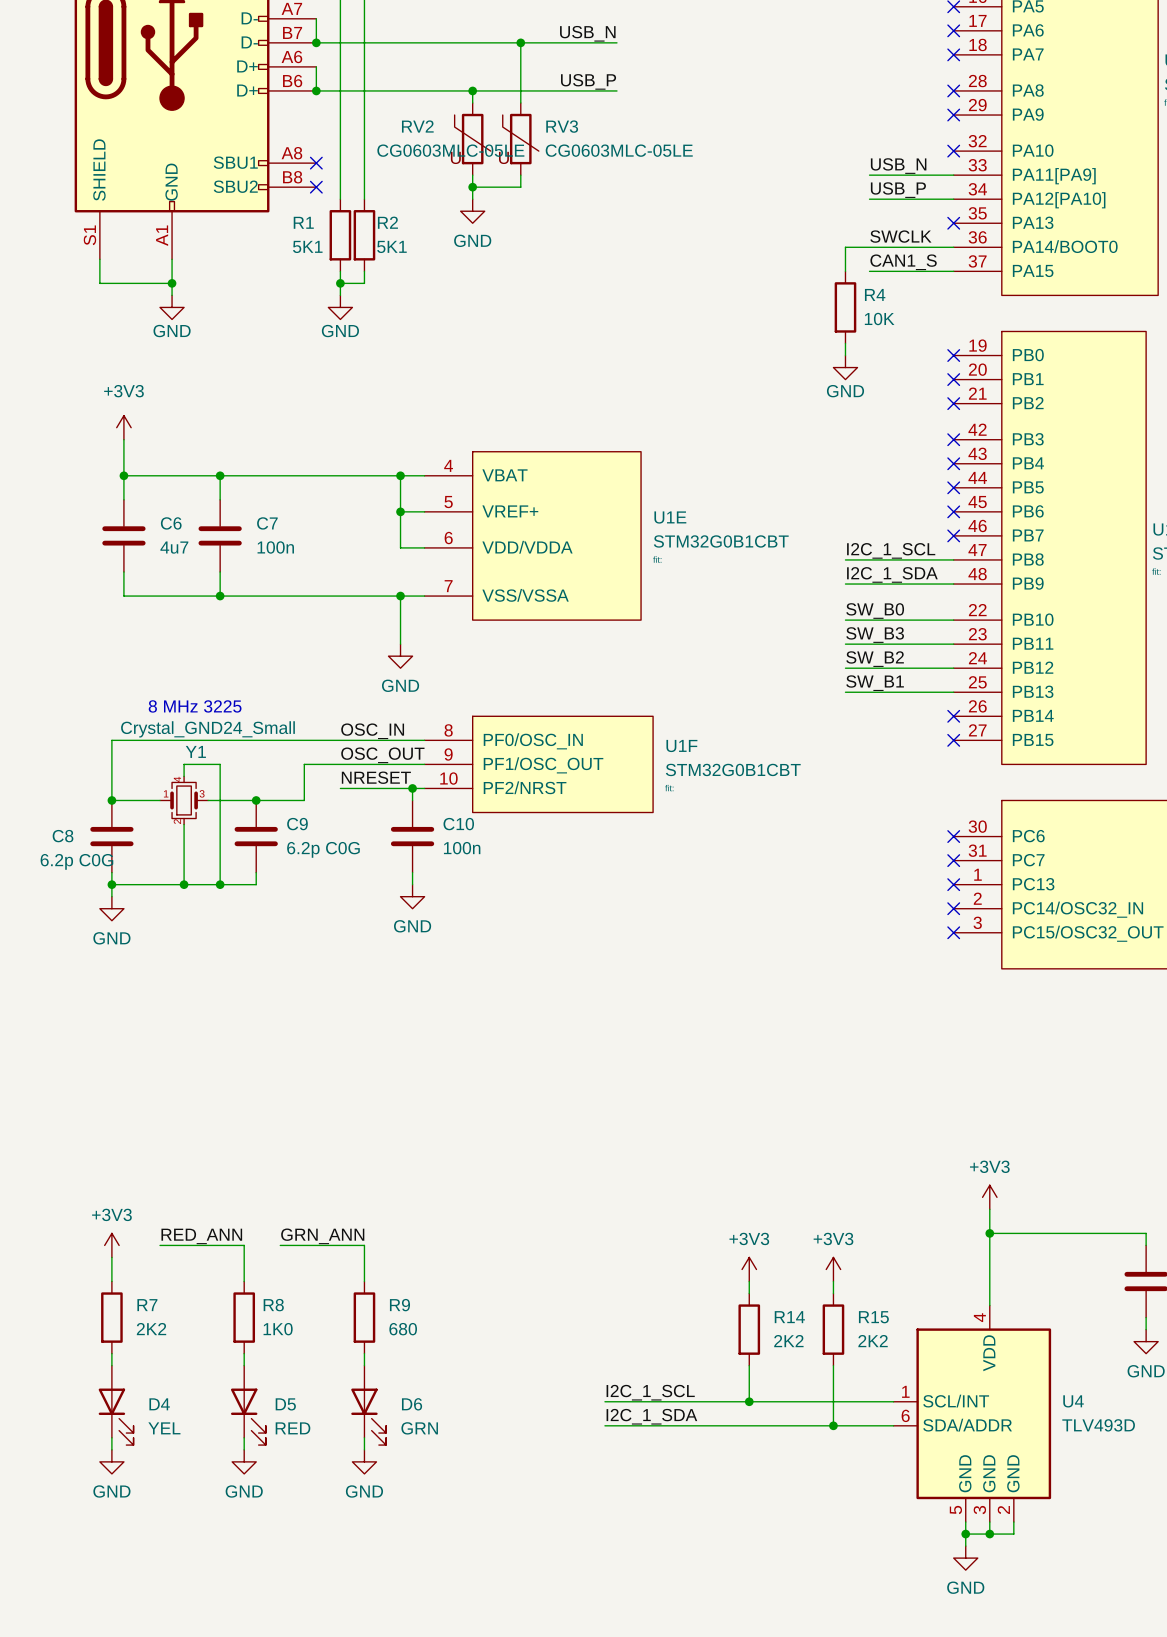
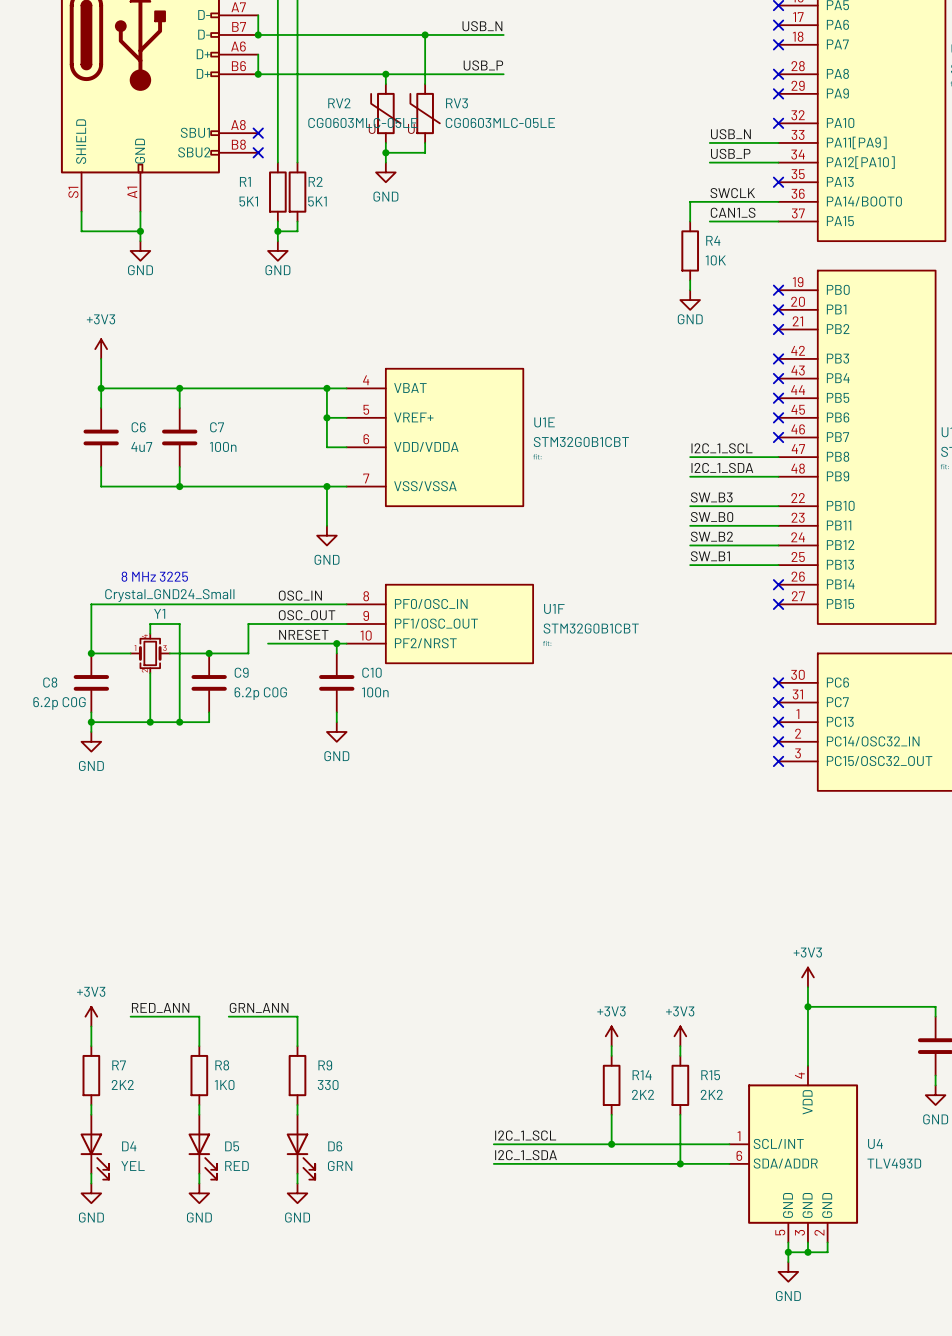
label: SW_B0 (875, 611) -> SW_B3 (711, 497)
label: SW_B3 (875, 635) -> SW_B0 (712, 517)
wire: none -> (268, 643) (277, 643)
R9 value: 680 (403, 1329) -> 330 (328, 1085)

